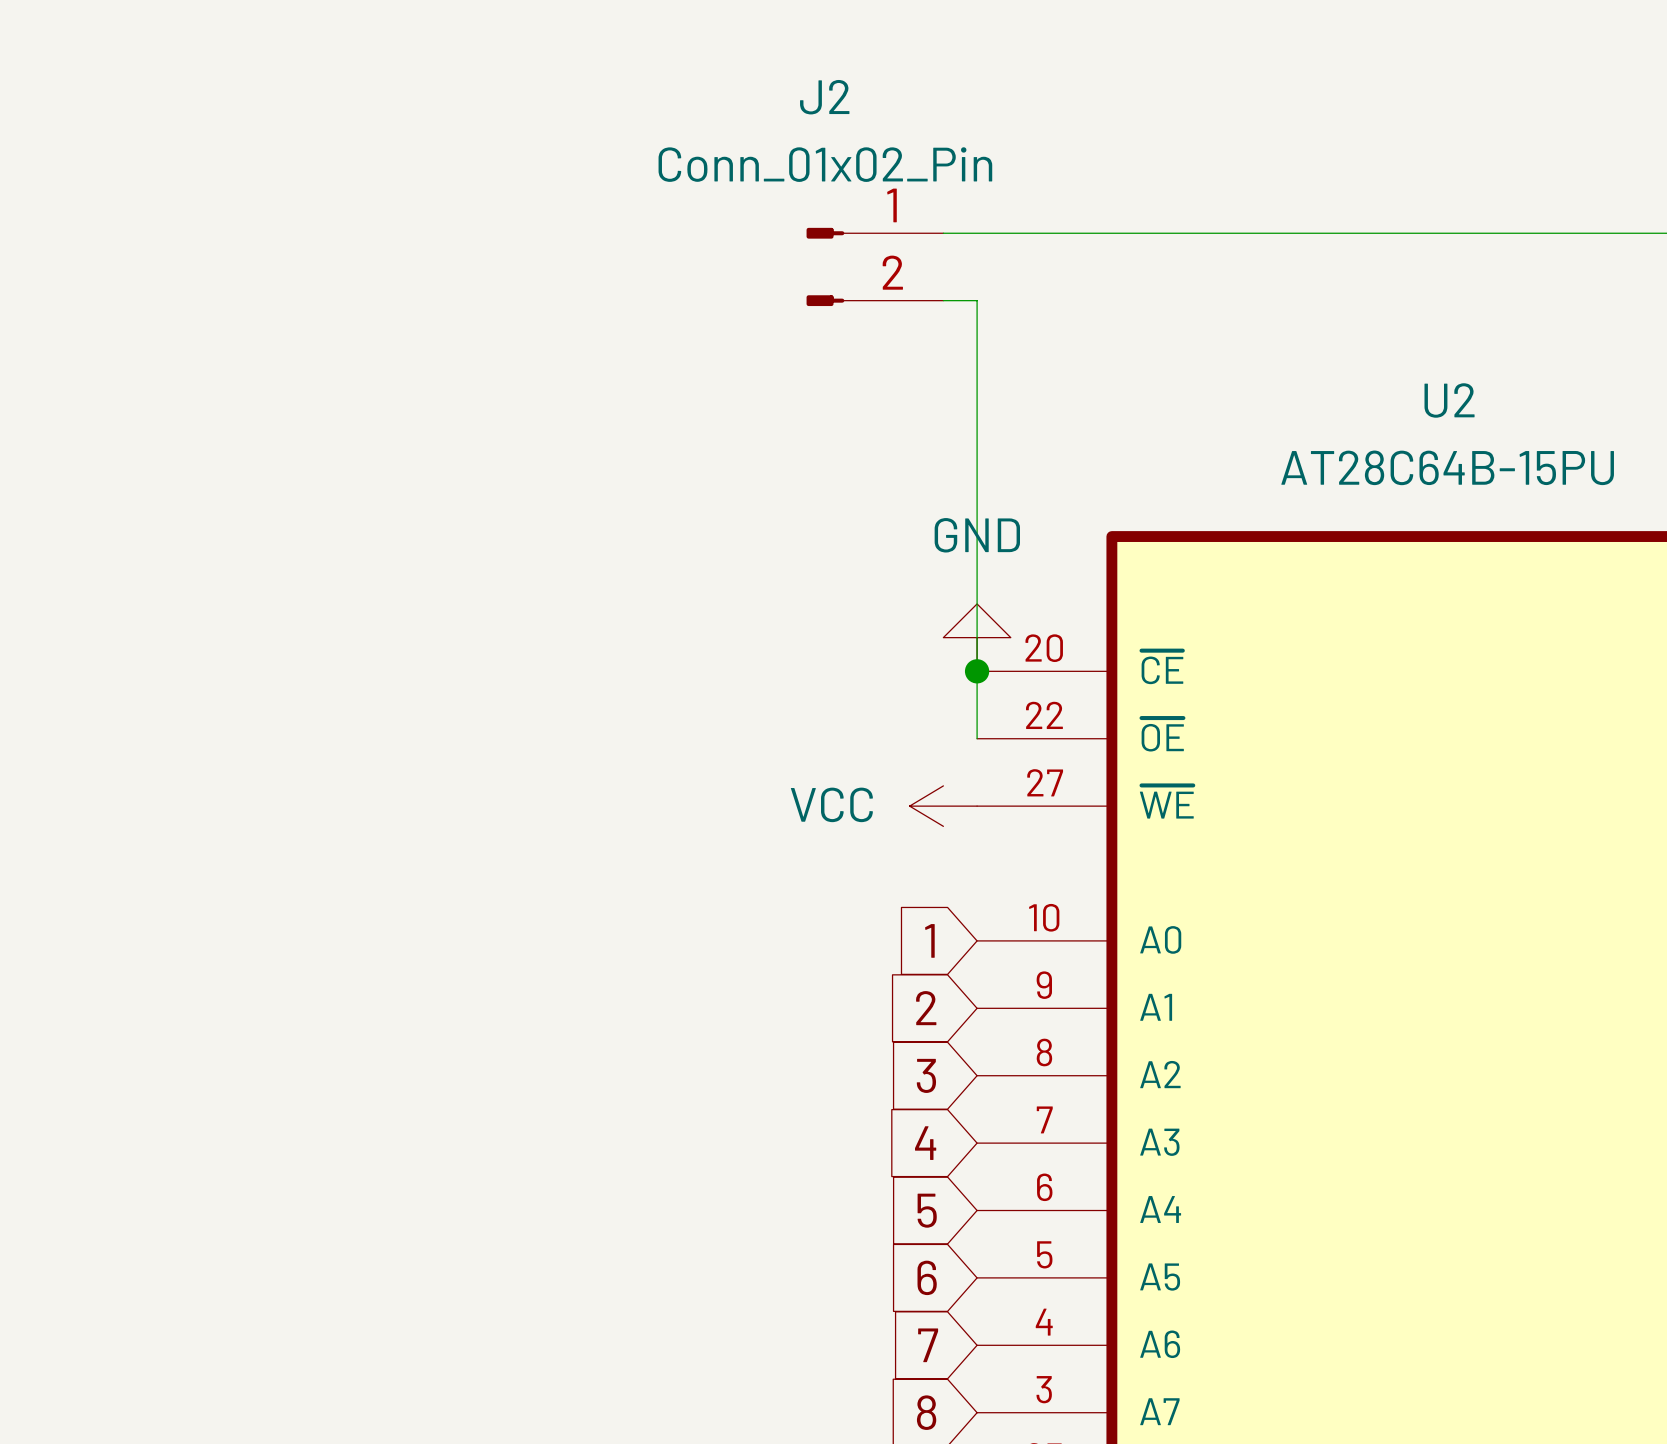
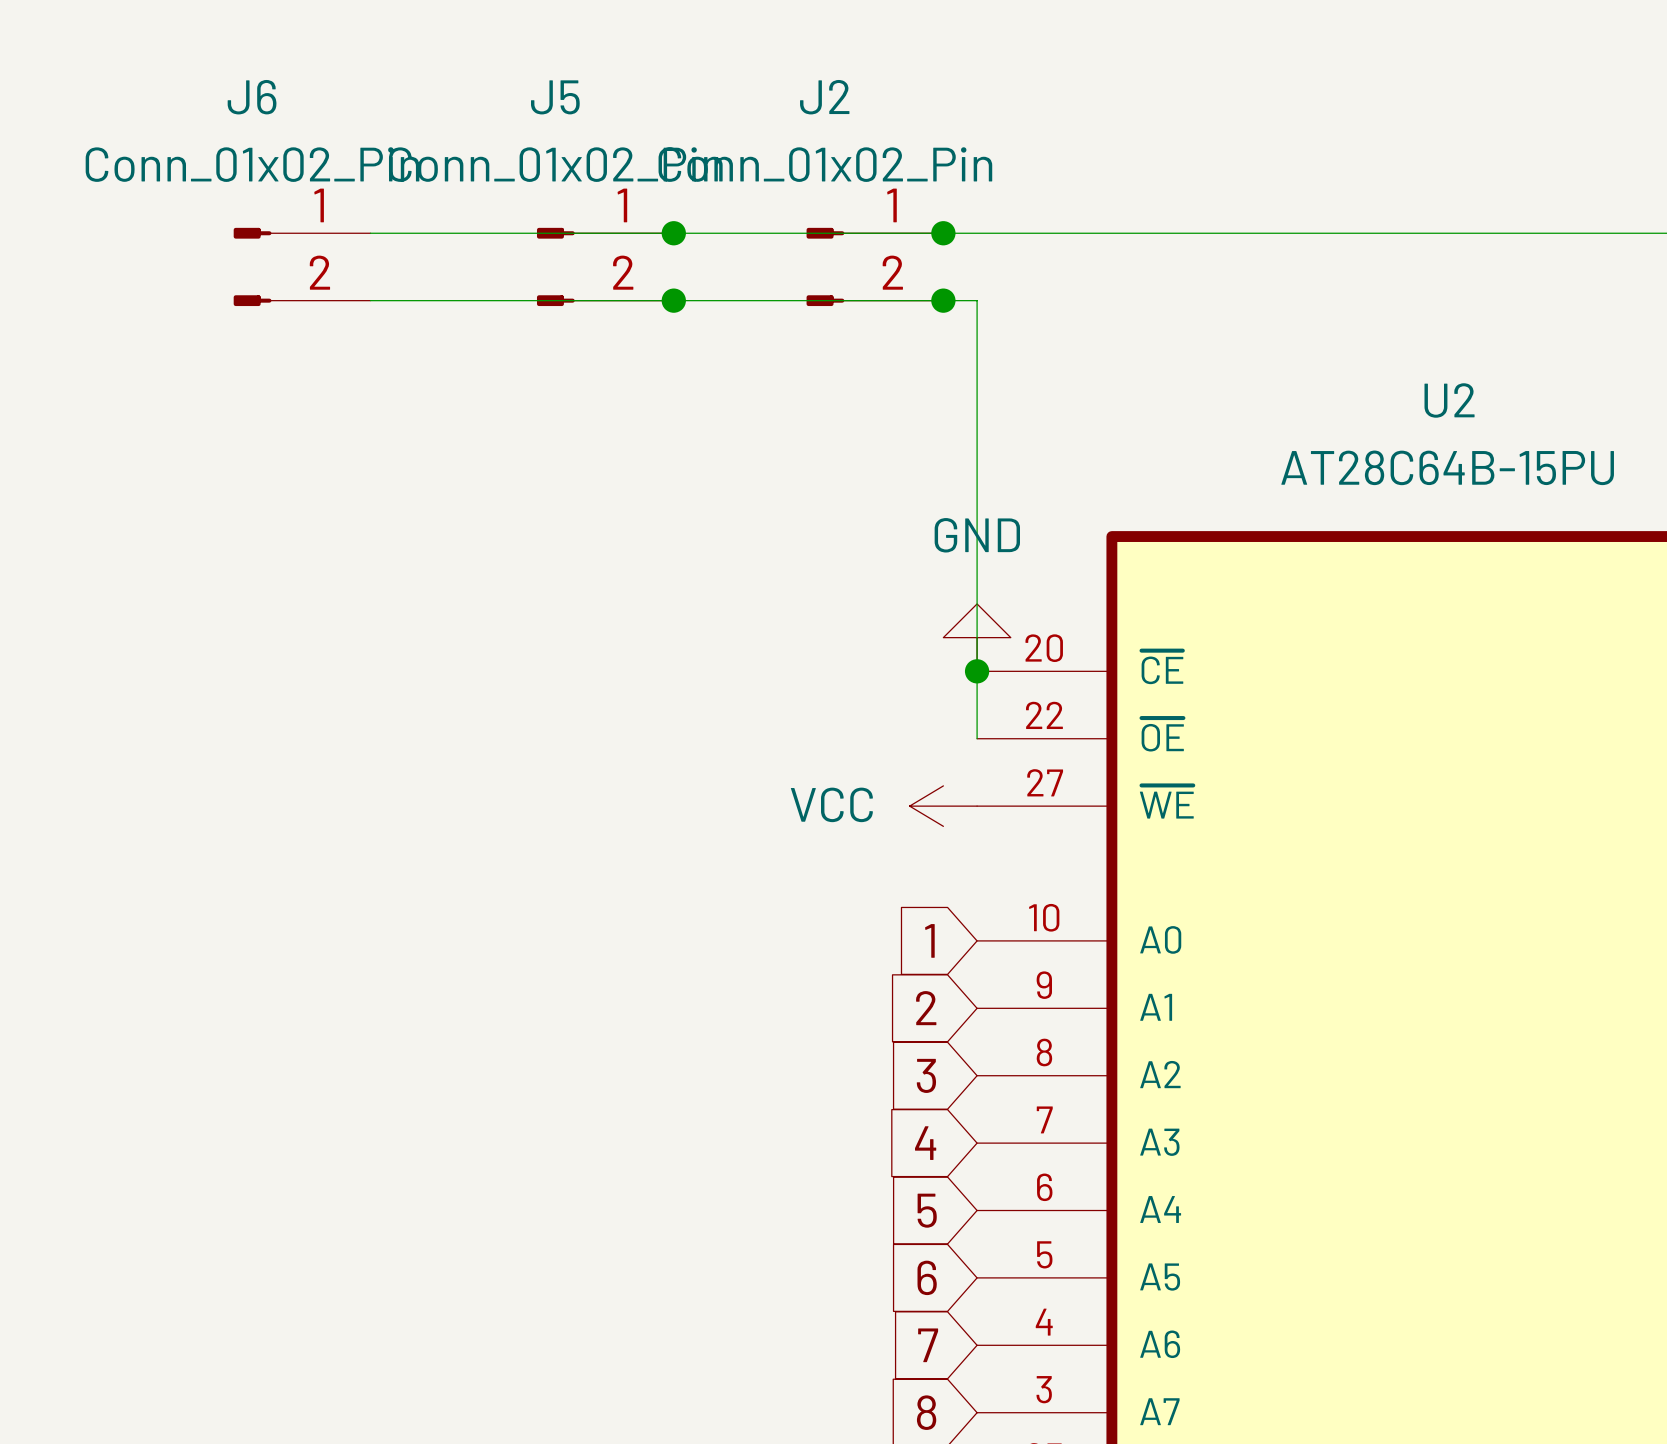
wire: none -> (370, 233) (943, 233)
junction: none -> (673, 233)
junction: none -> (943, 233)
J6: none -> Conn_01x02_Pin (302, 266)
J5: none -> Conn_01x02_Pin (605, 266)
wire: none -> (370, 300) (943, 300)
junction: none -> (673, 300)
junction: none -> (943, 300)

